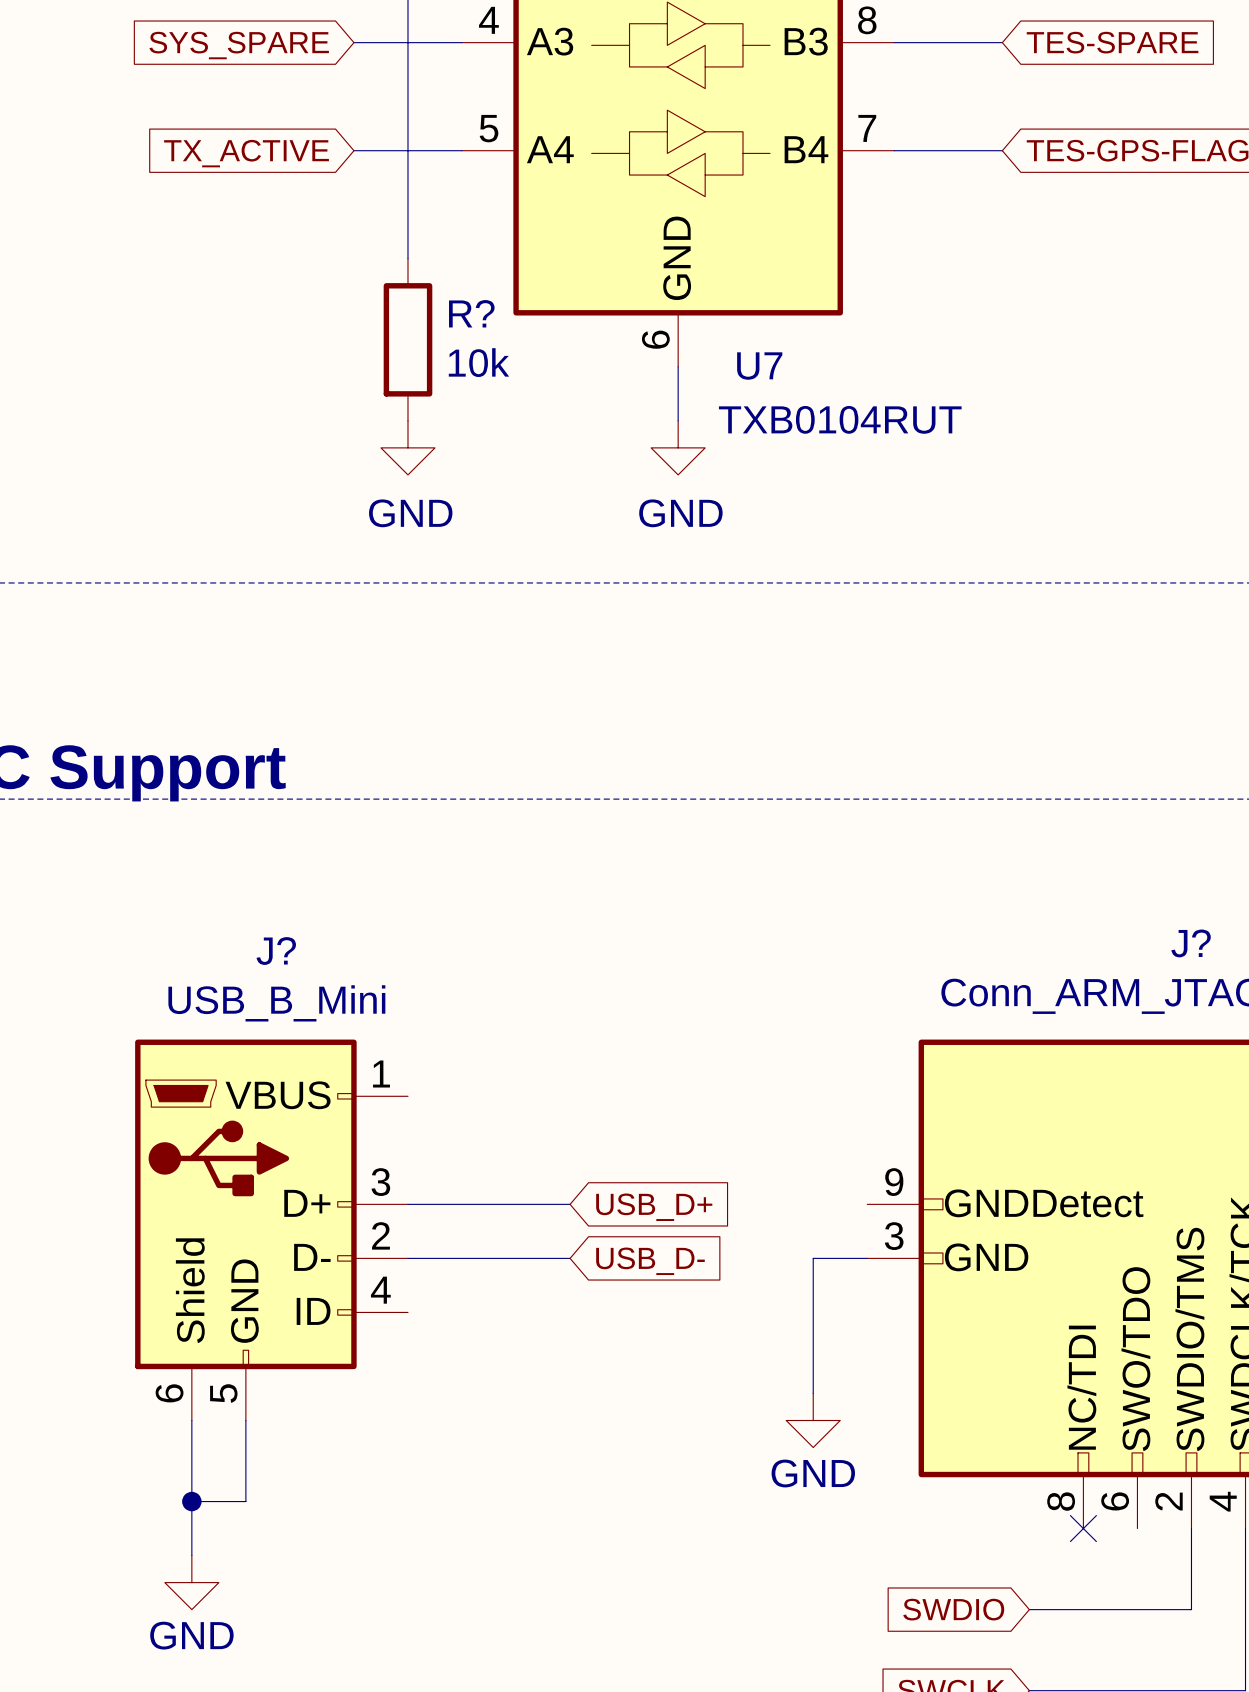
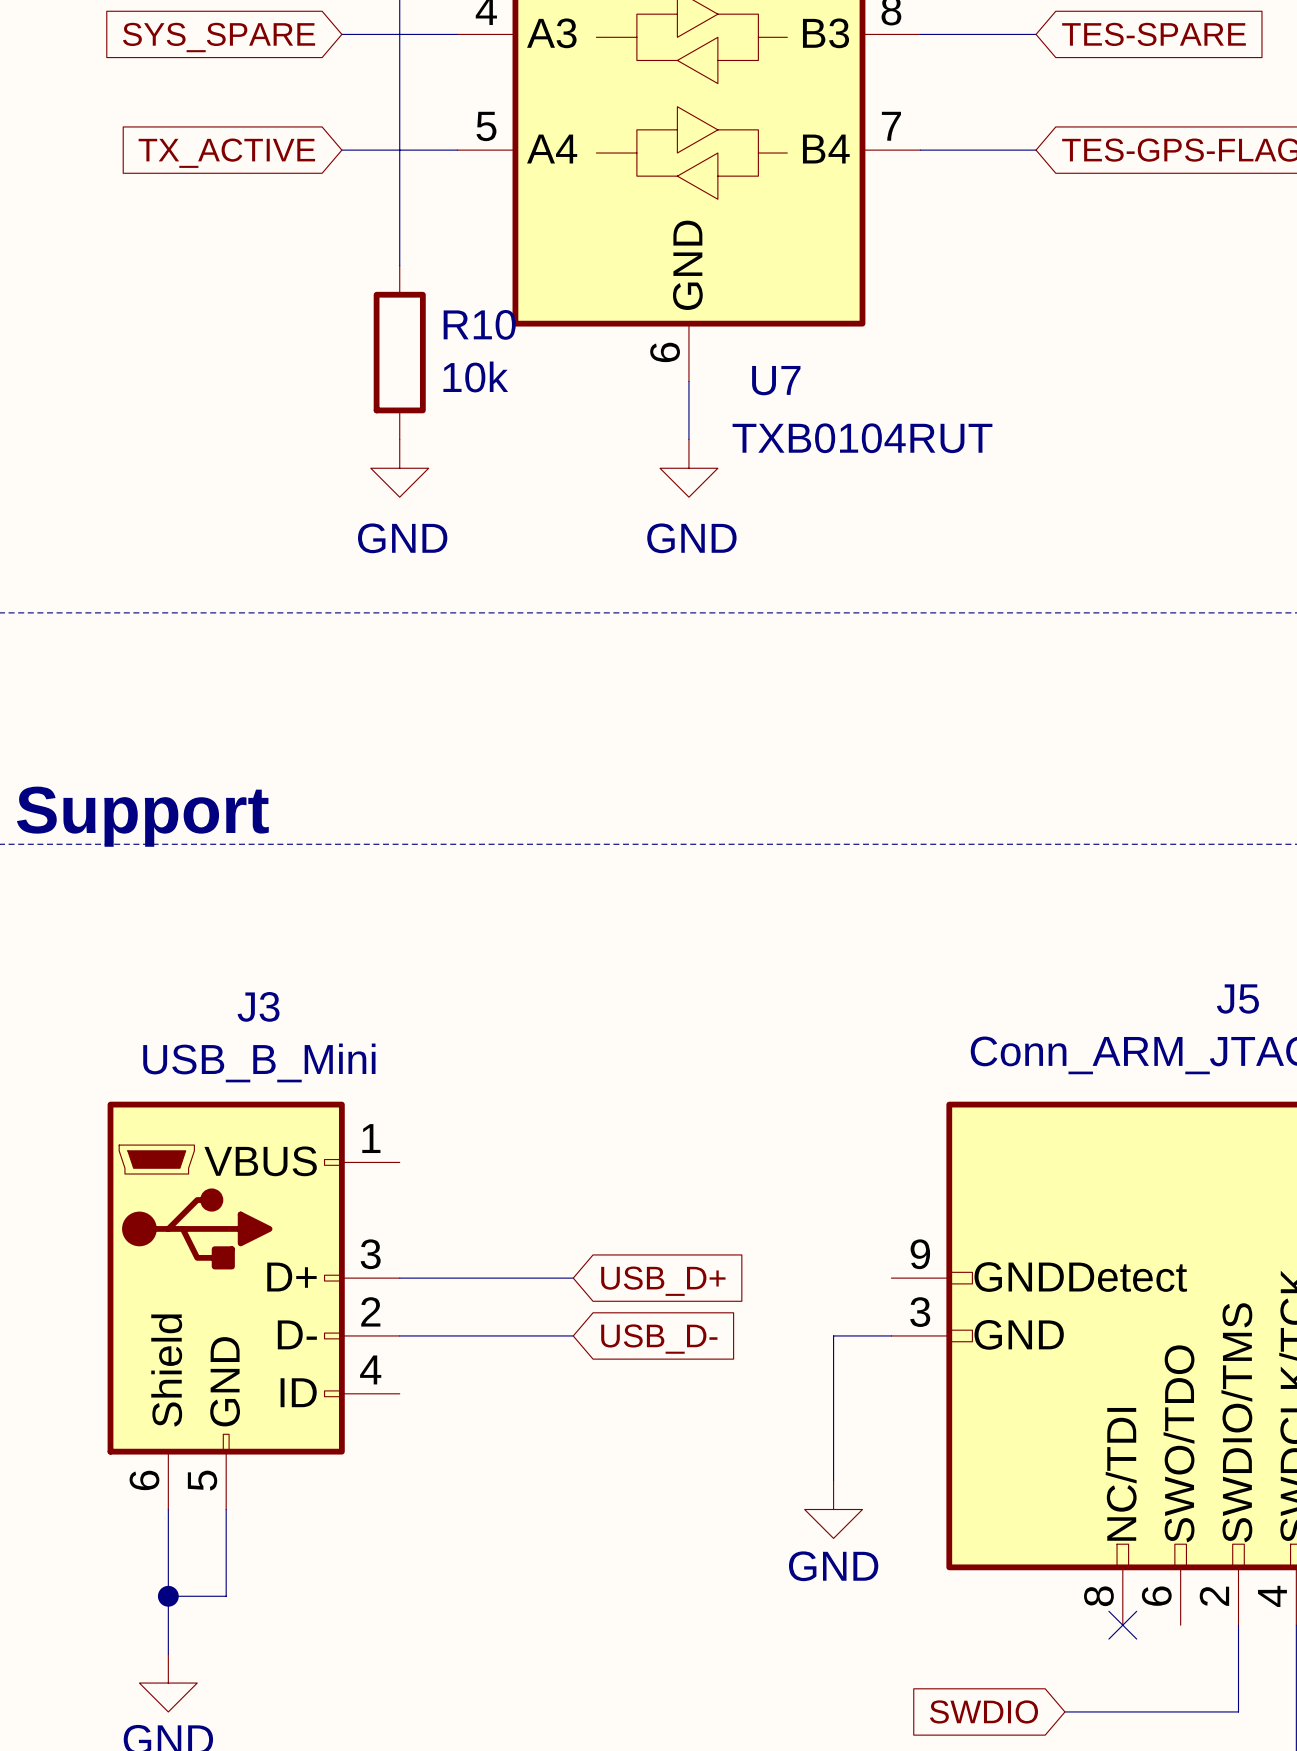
R? name: R? (471, 313) -> R10 (479, 324)
J? name: J? (1191, 943) -> J5 (1237, 999)
J? name: J? (276, 951) -> J3 (258, 1006)

